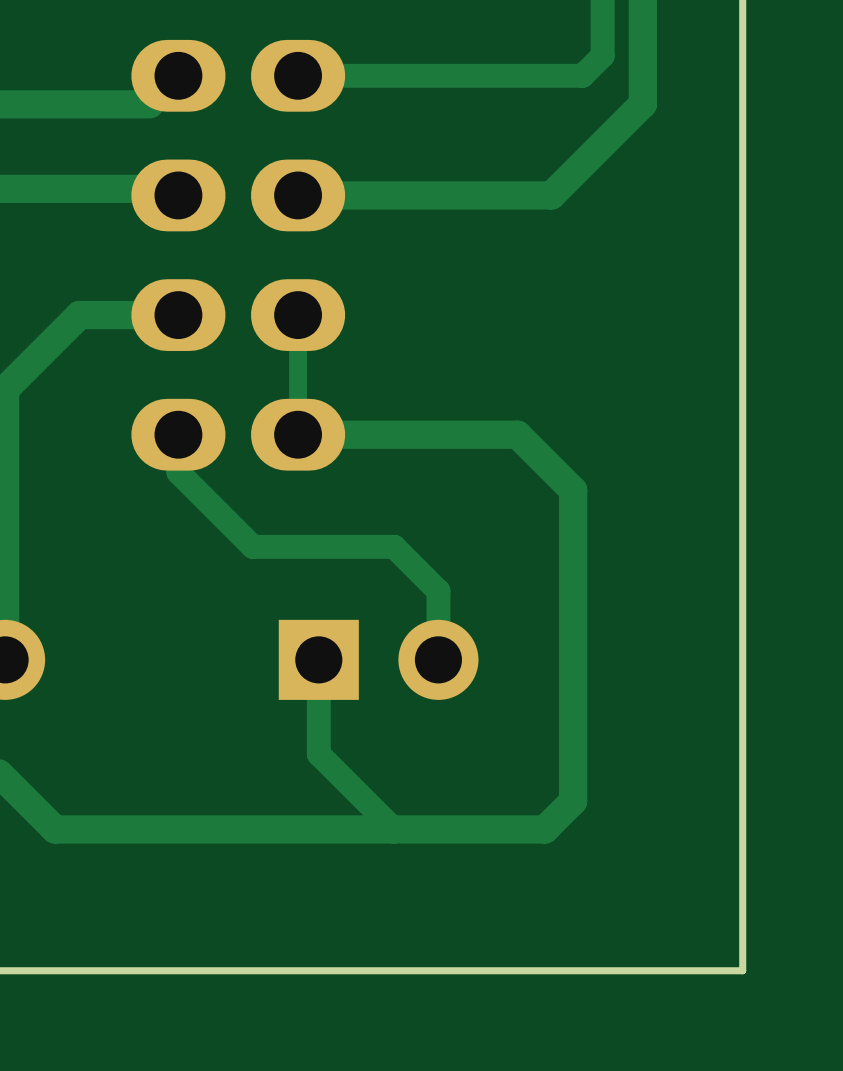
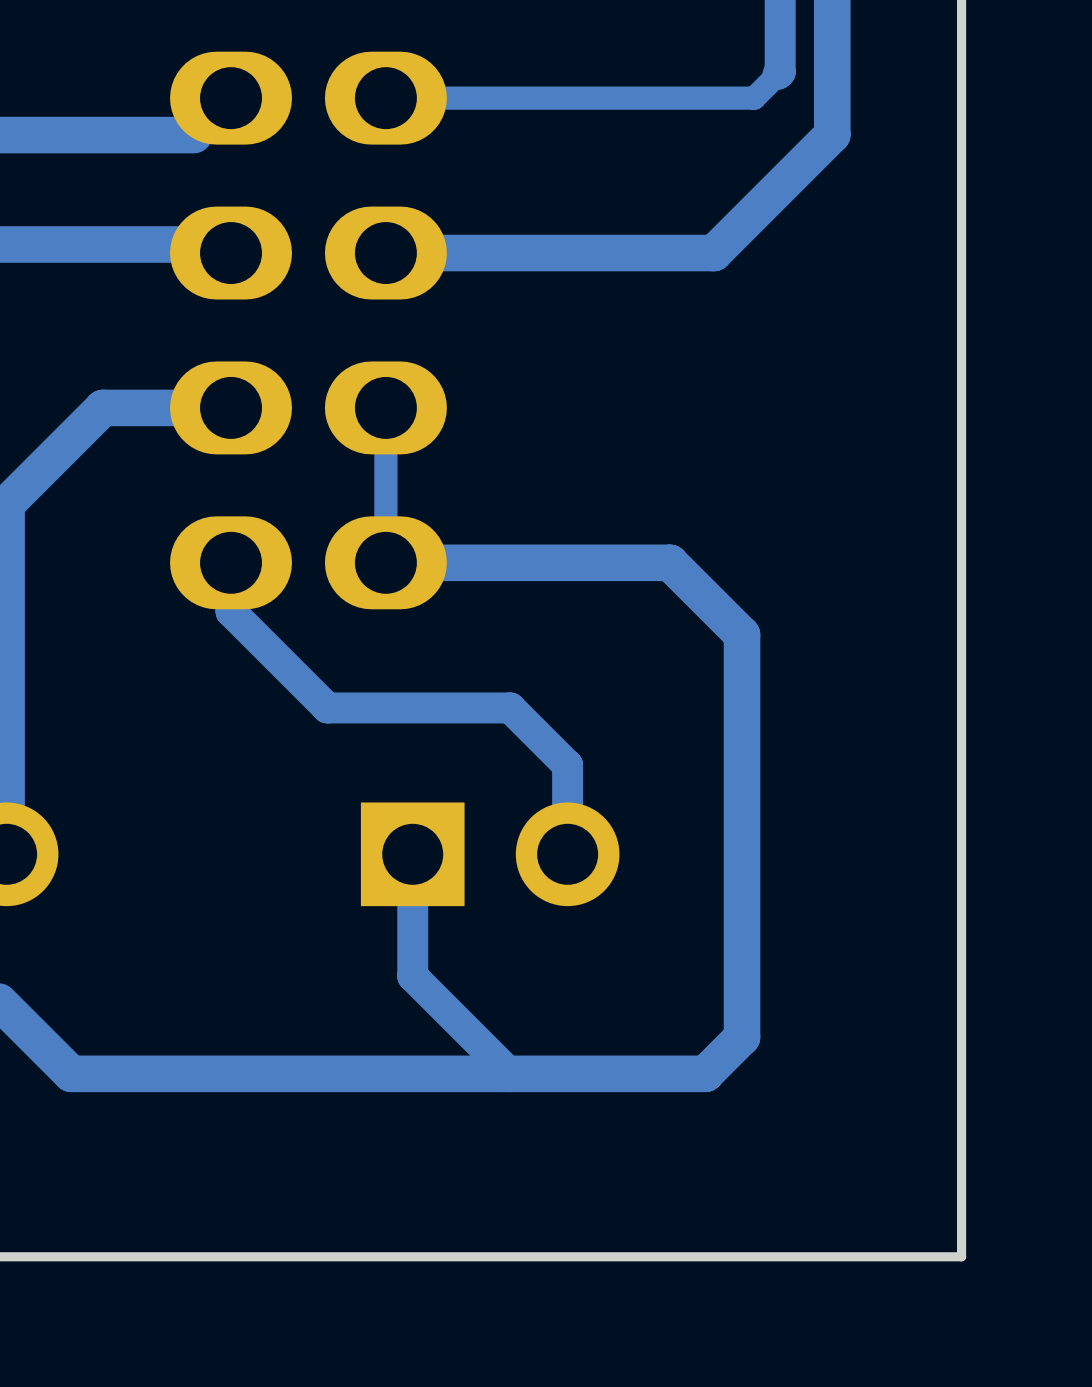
track width: thick (600, 57) (582, 75) (298, 75) -> thin (777, 74) (754, 98) (385, 98)

